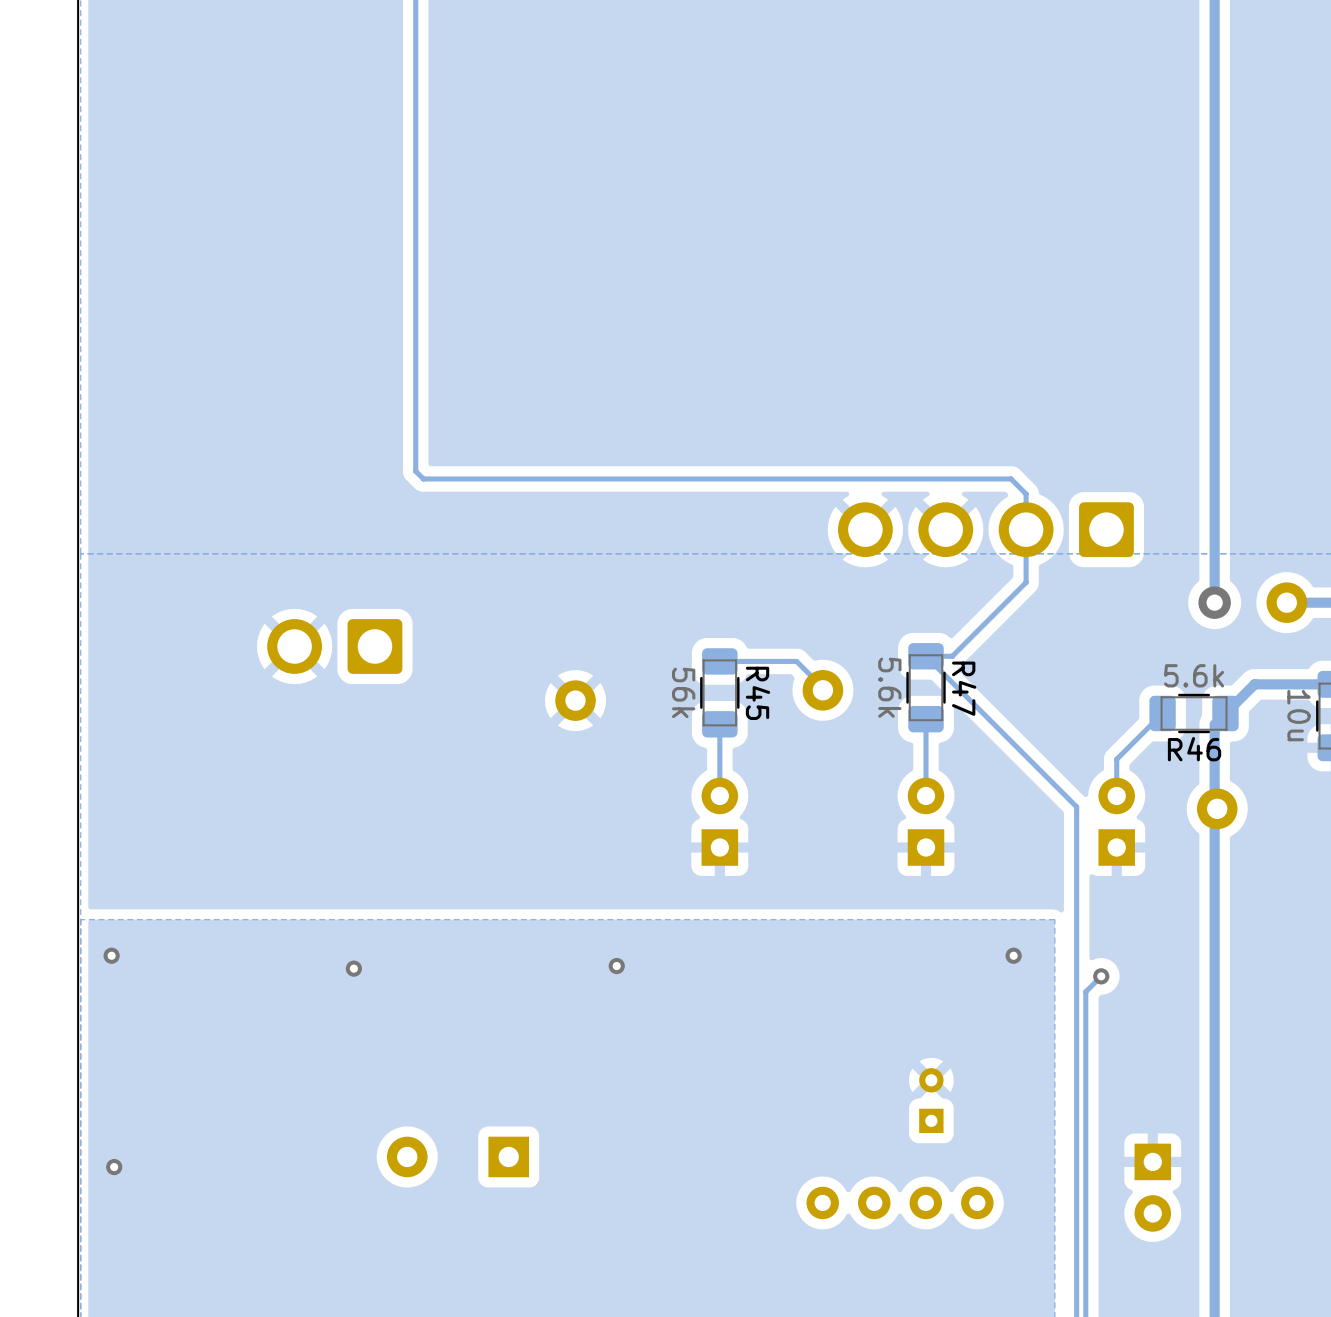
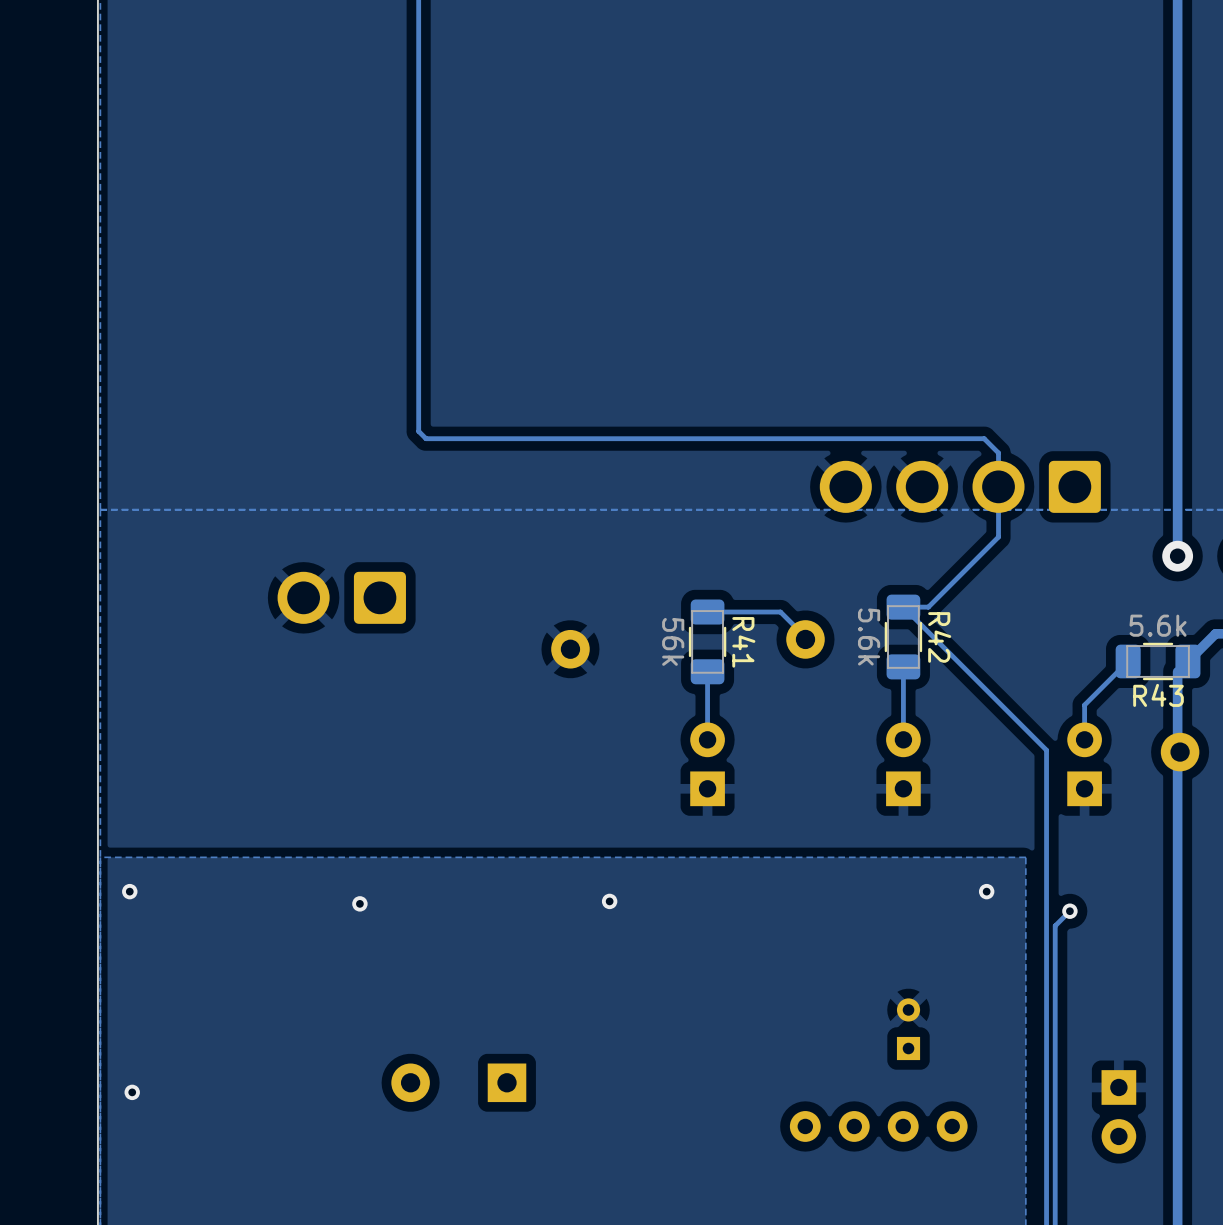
R47 name: R47 (964, 688) -> R42 (939, 637)
R45 name: R45 (758, 693) -> R41 (743, 642)
R46 name: R46 (1194, 749) -> R43 (1158, 695)

